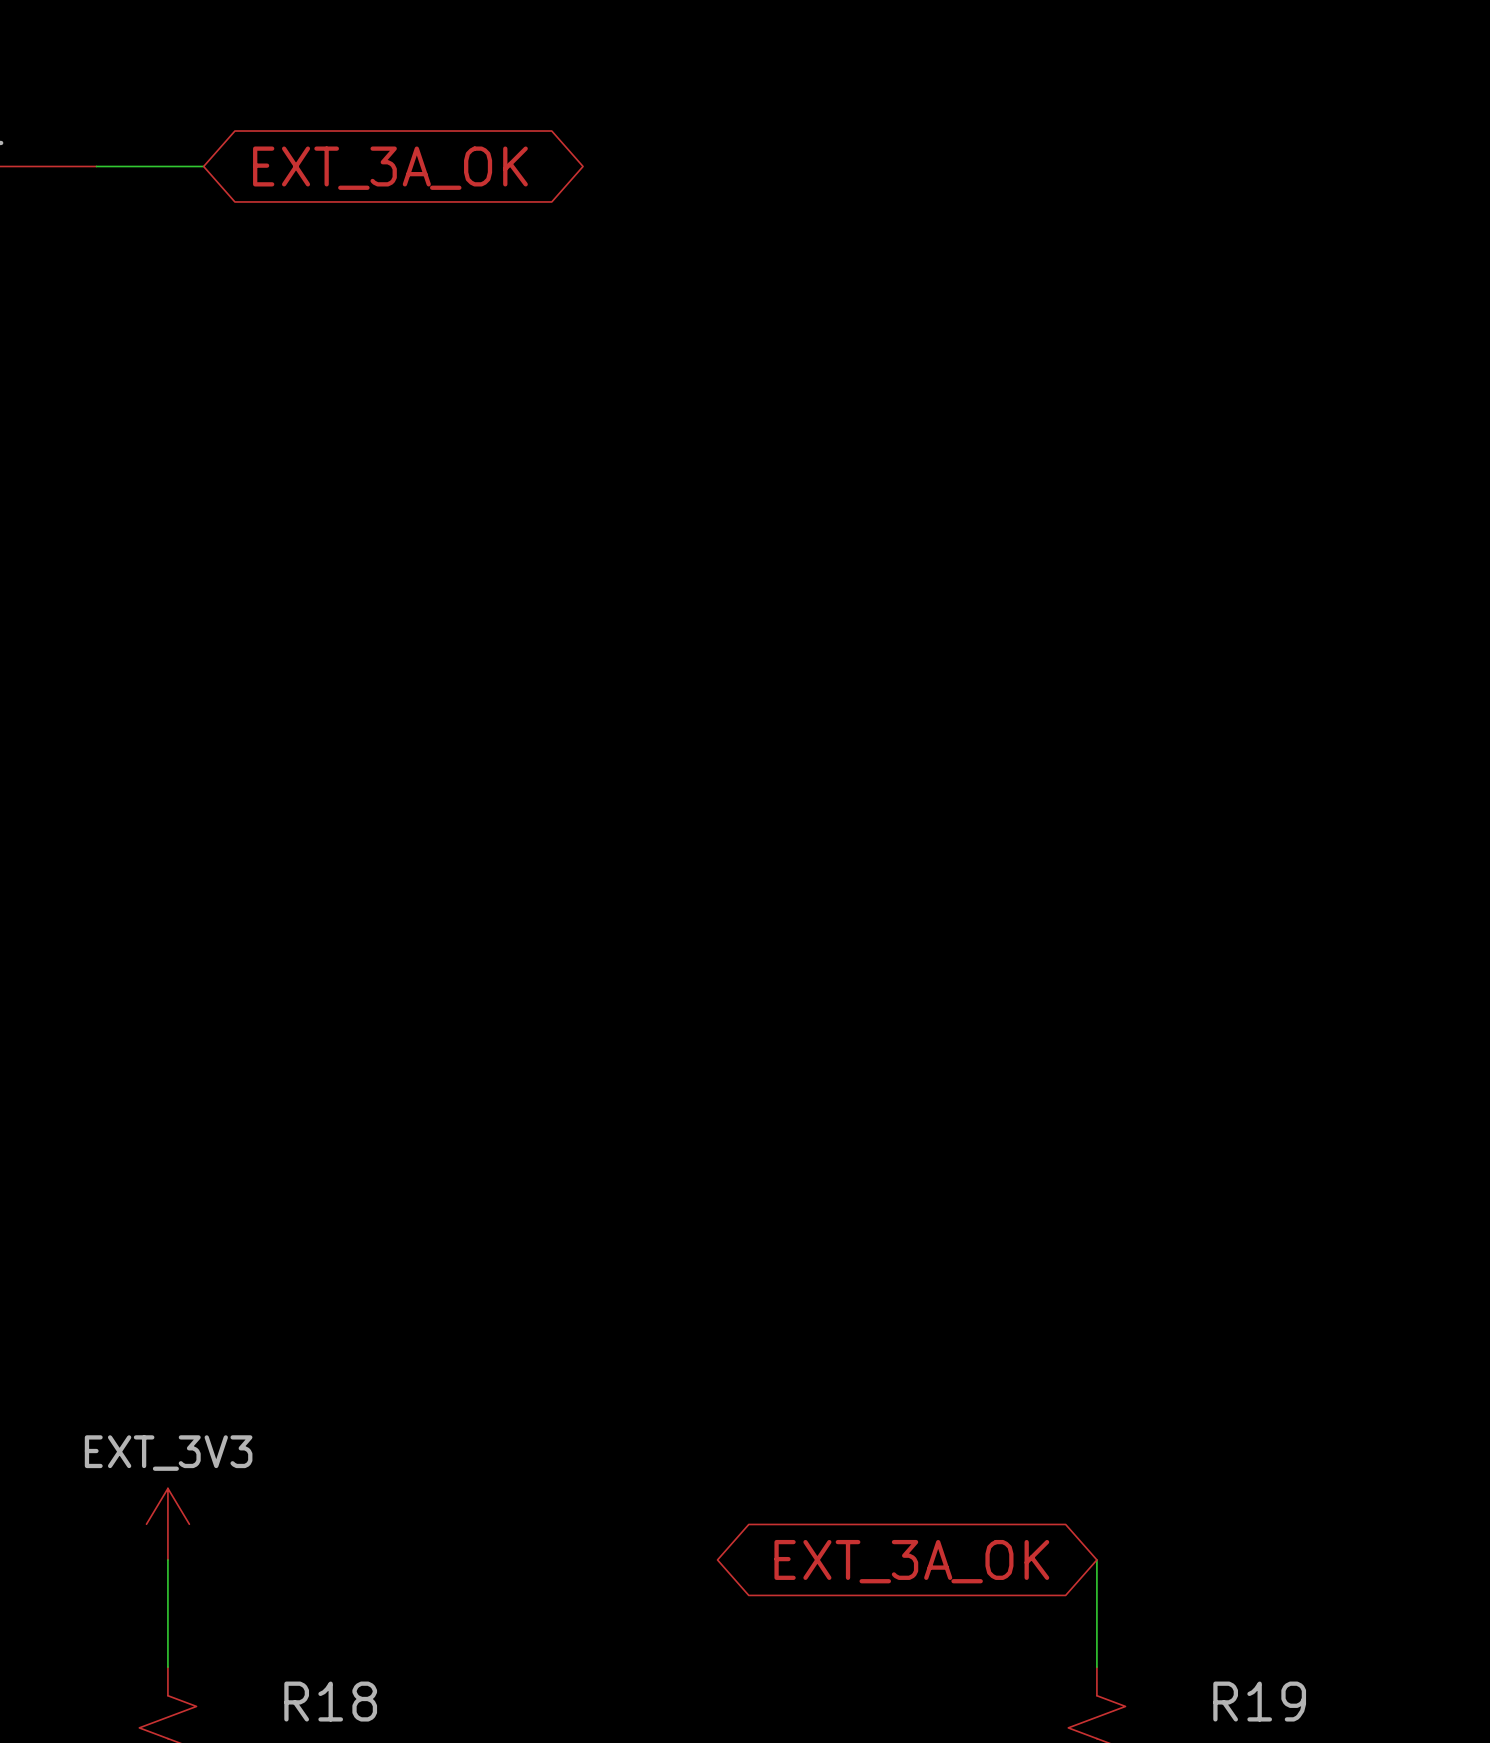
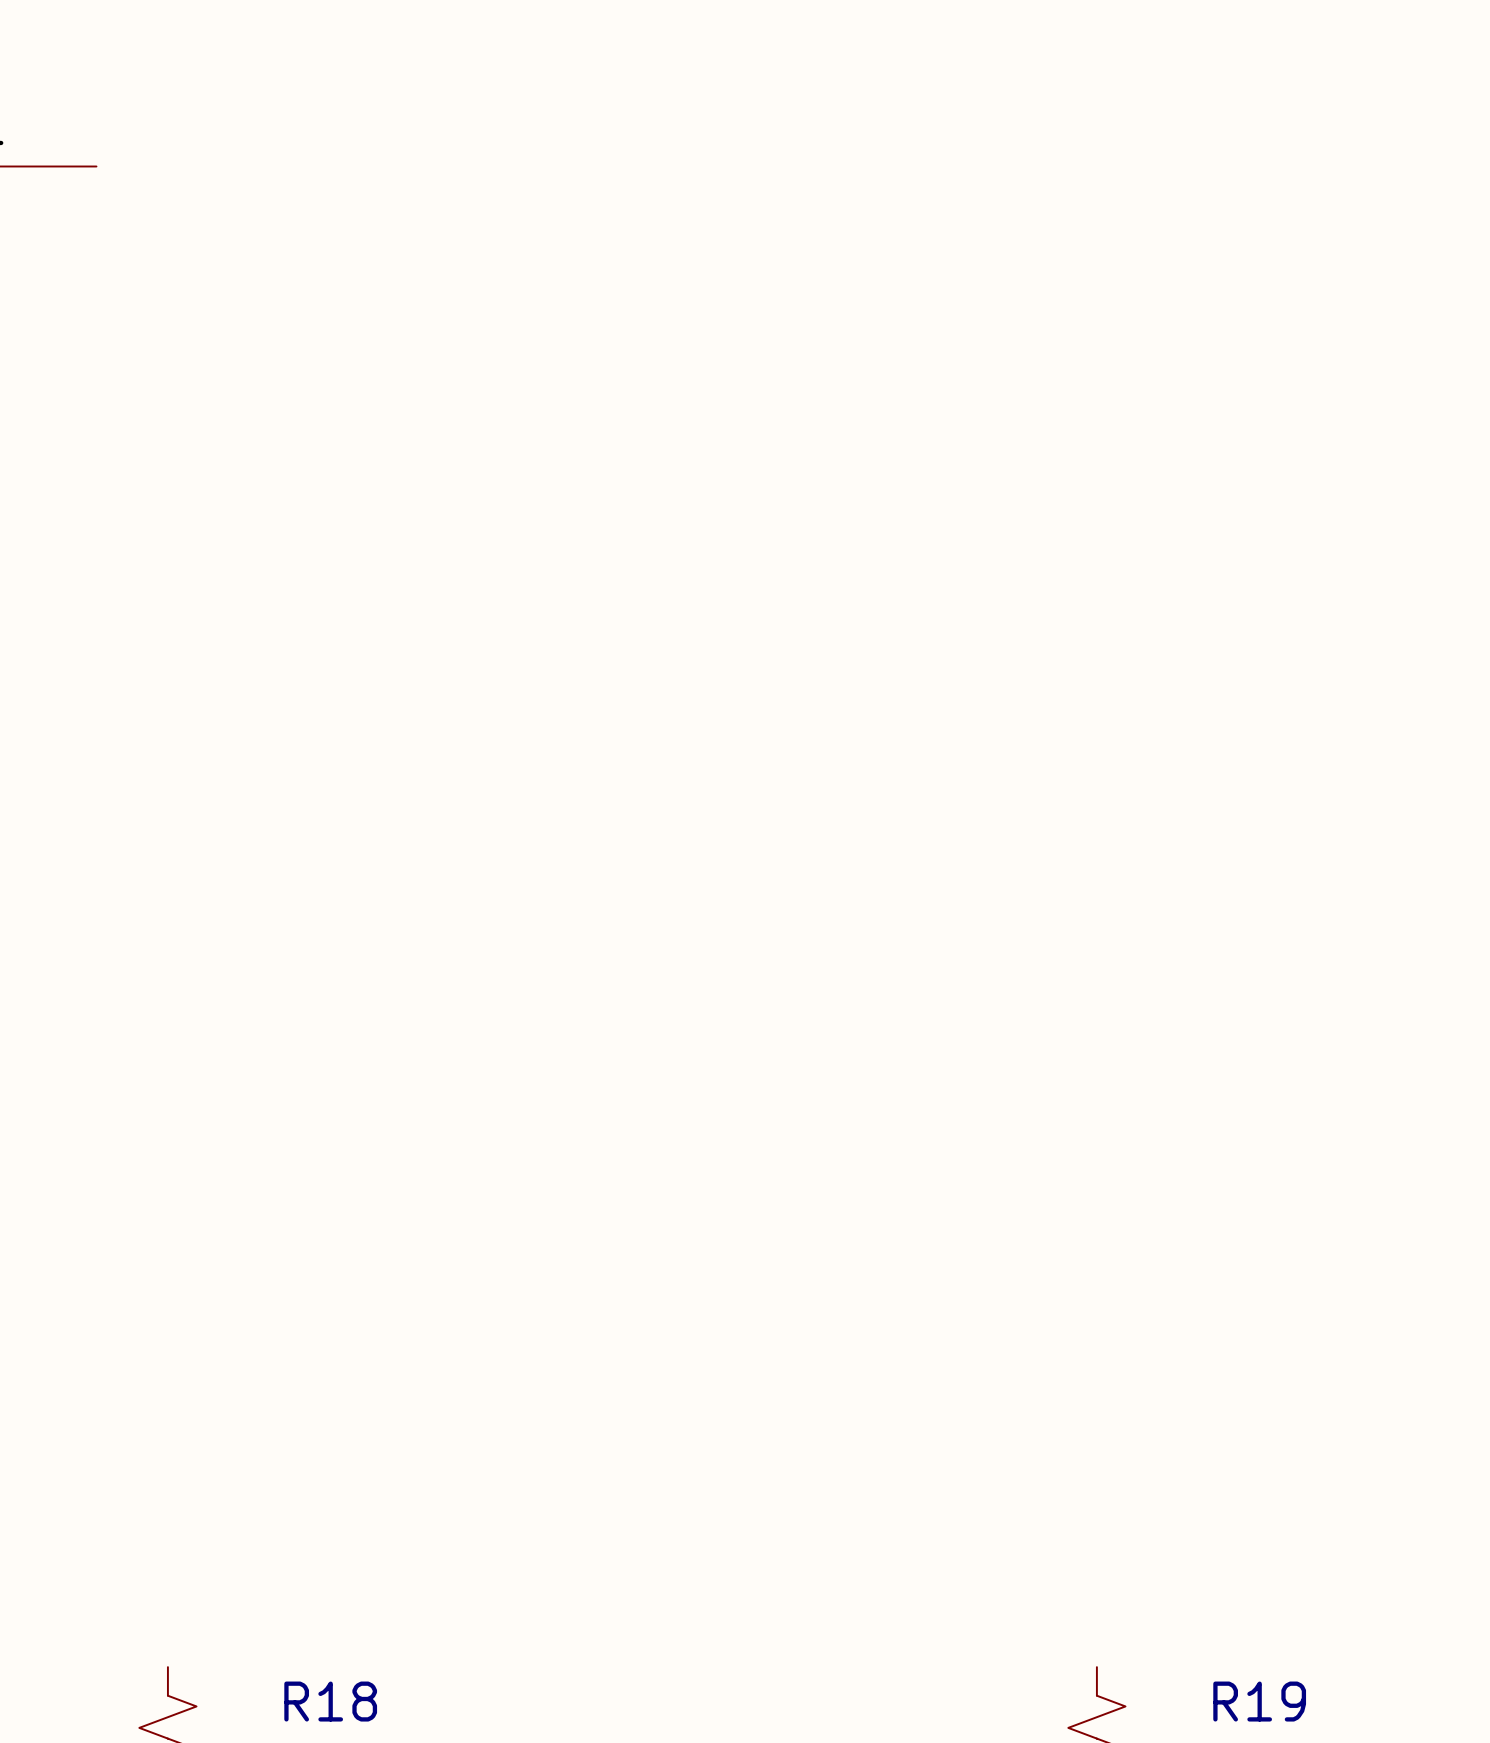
wire: (96, 166) (203, 166) -> none
global label: EXT_3A_OK (390, 168) -> none
power symbol: EXT_3V3 (167, 1524) -> none
wire: (167, 1559) (167, 1667) -> none
wire: (1096, 1559) (1096, 1667) -> none
global label: EXT_3A_OK (911, 1561) -> none

